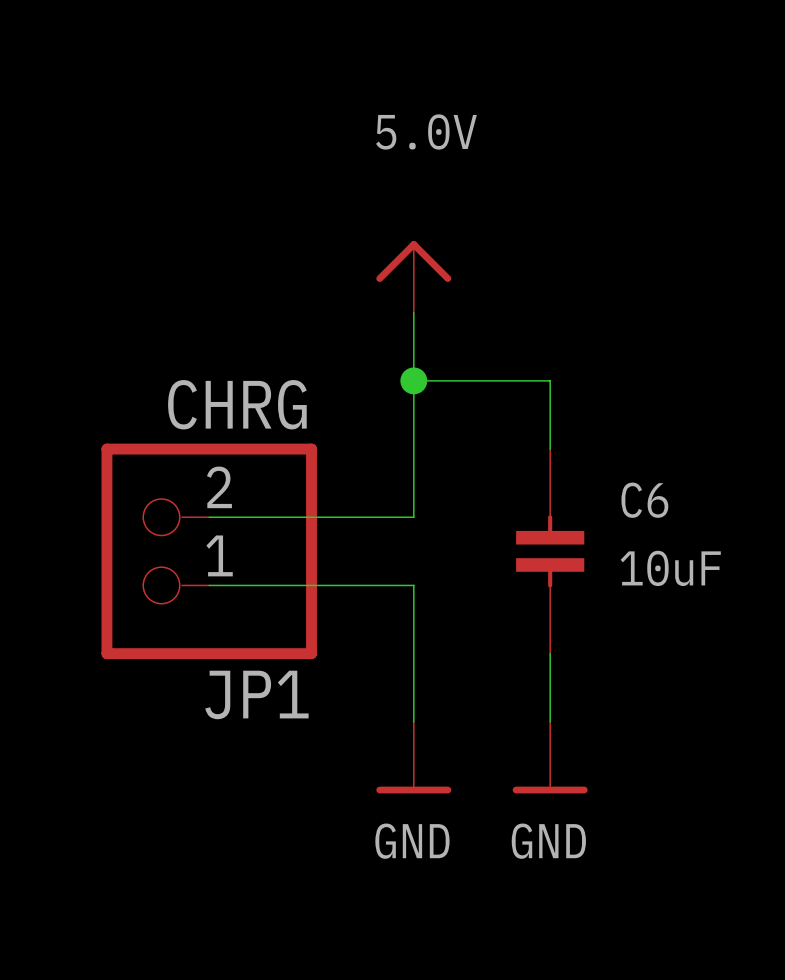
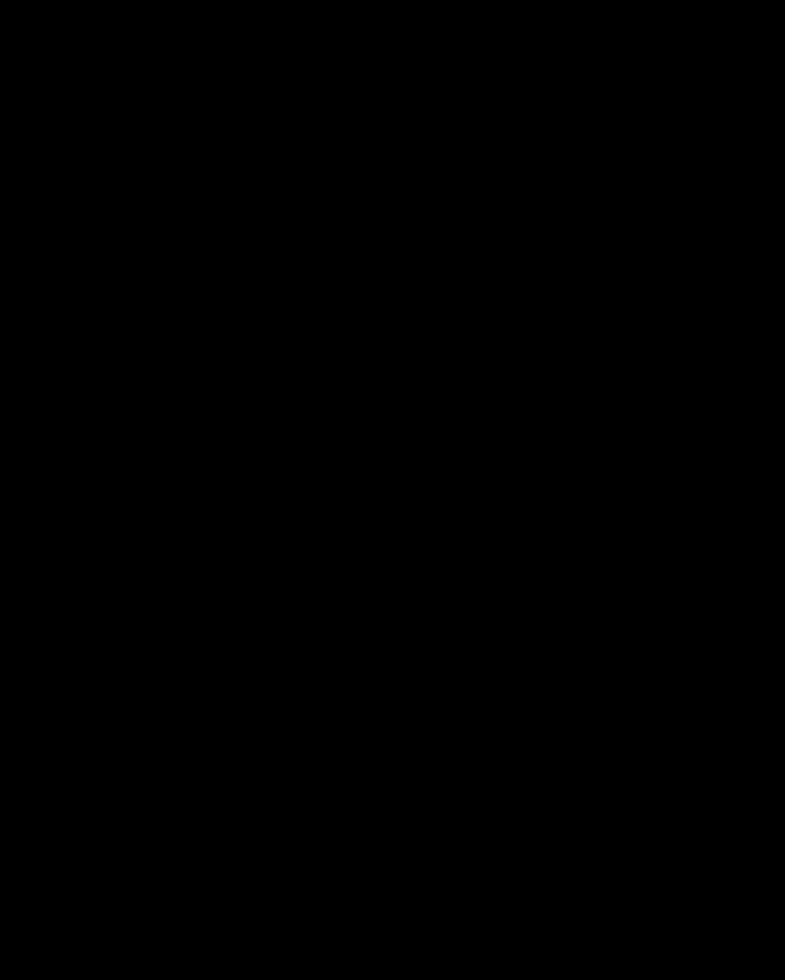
power symbol: 5.0V (413, 276) -> none
wire: (413, 312) (413, 517) (209, 517) -> none
wire: (413, 380) (550, 380) (550, 449) -> none
junction: (413, 380) -> none
JP1: CHRG (209, 551) -> none
C6: 10uF (550, 551) -> none
wire: (209, 585) (413, 585) (413, 721) -> none
wire: (550, 653) (550, 721) -> none
power symbol: GND (413, 757) -> none
power symbol: GND (550, 757) -> none

